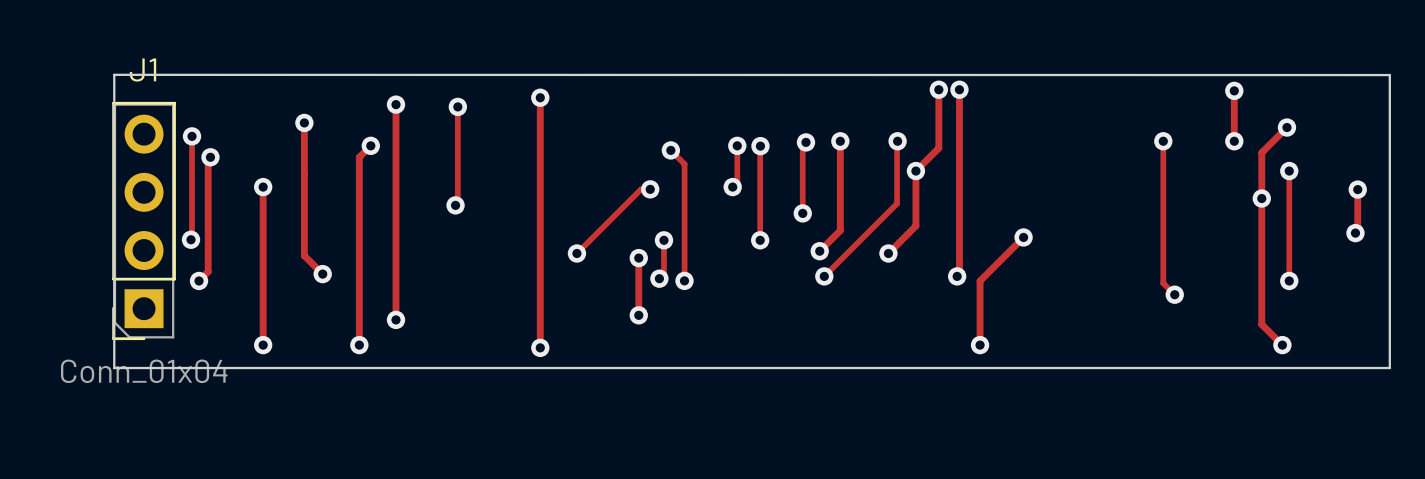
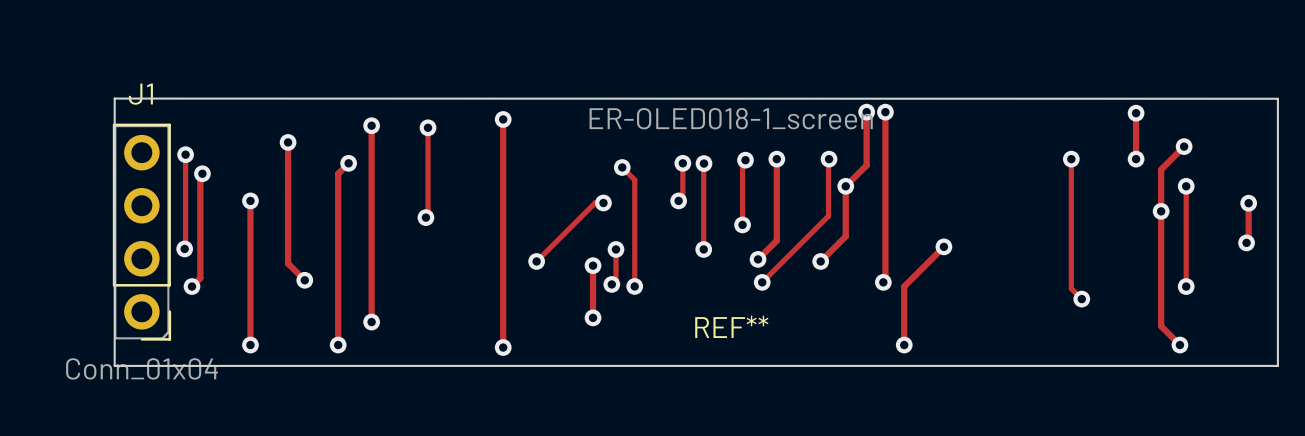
J1 footprint: [112, 101, 176, 341] -> [112, 123, 172, 341]
REF**: none -> ER-OLED018-1_screen (731, 222)

